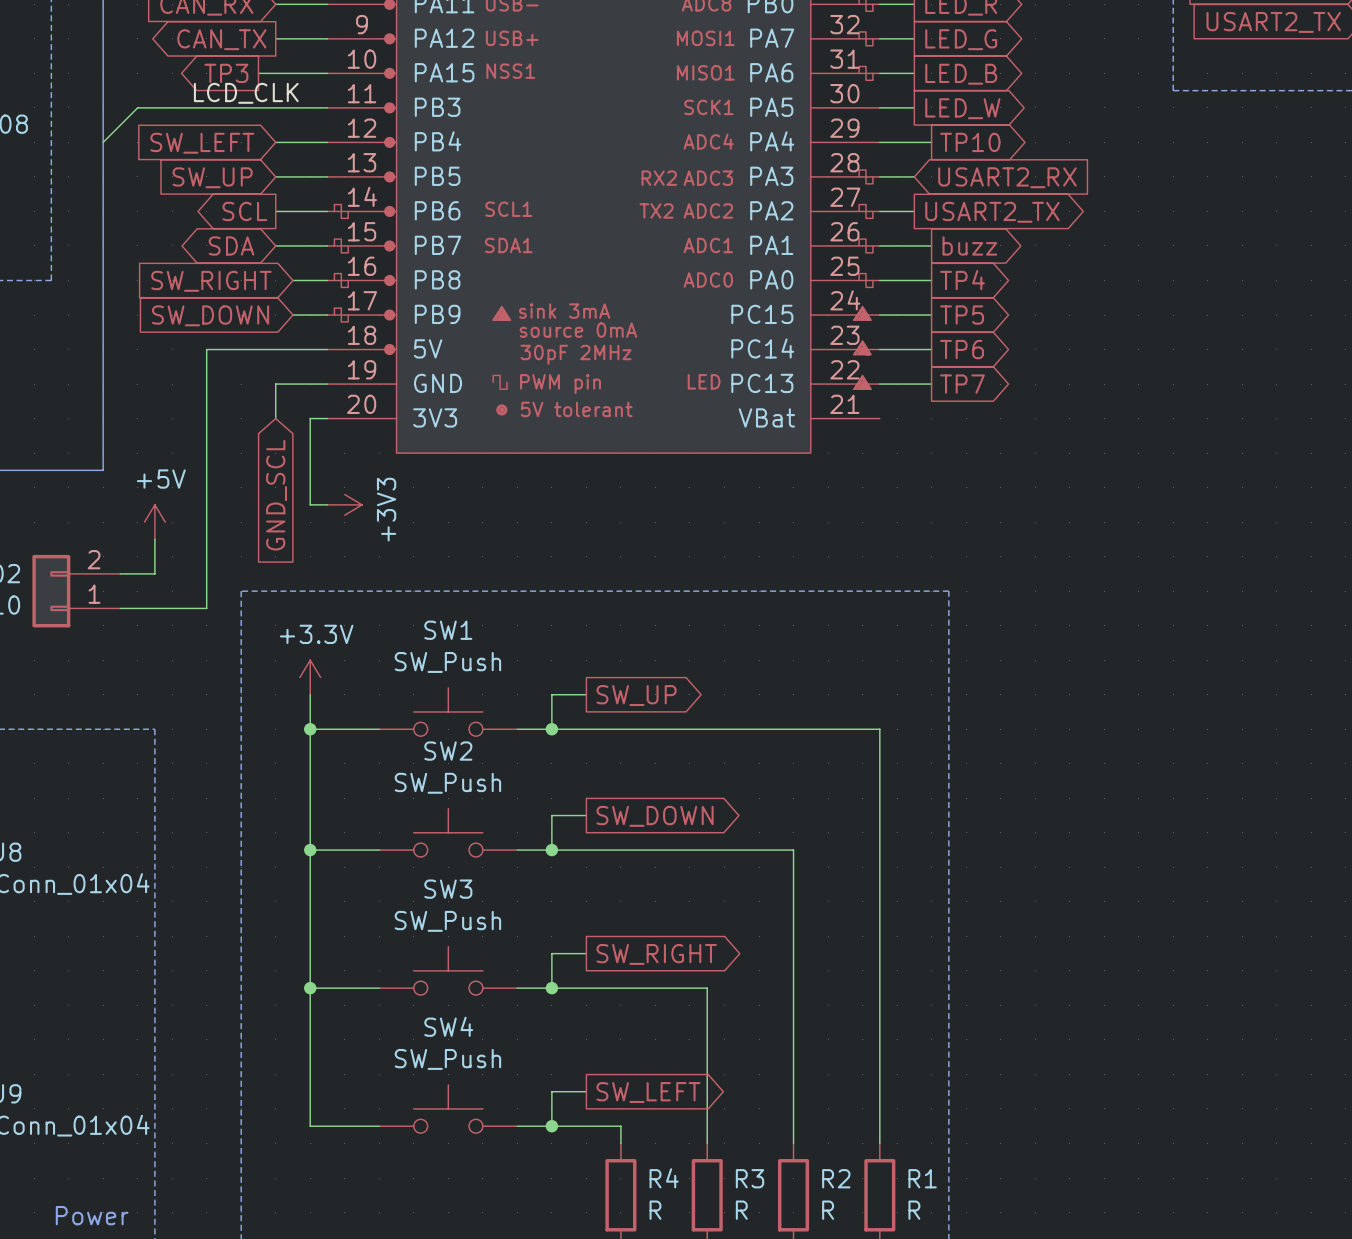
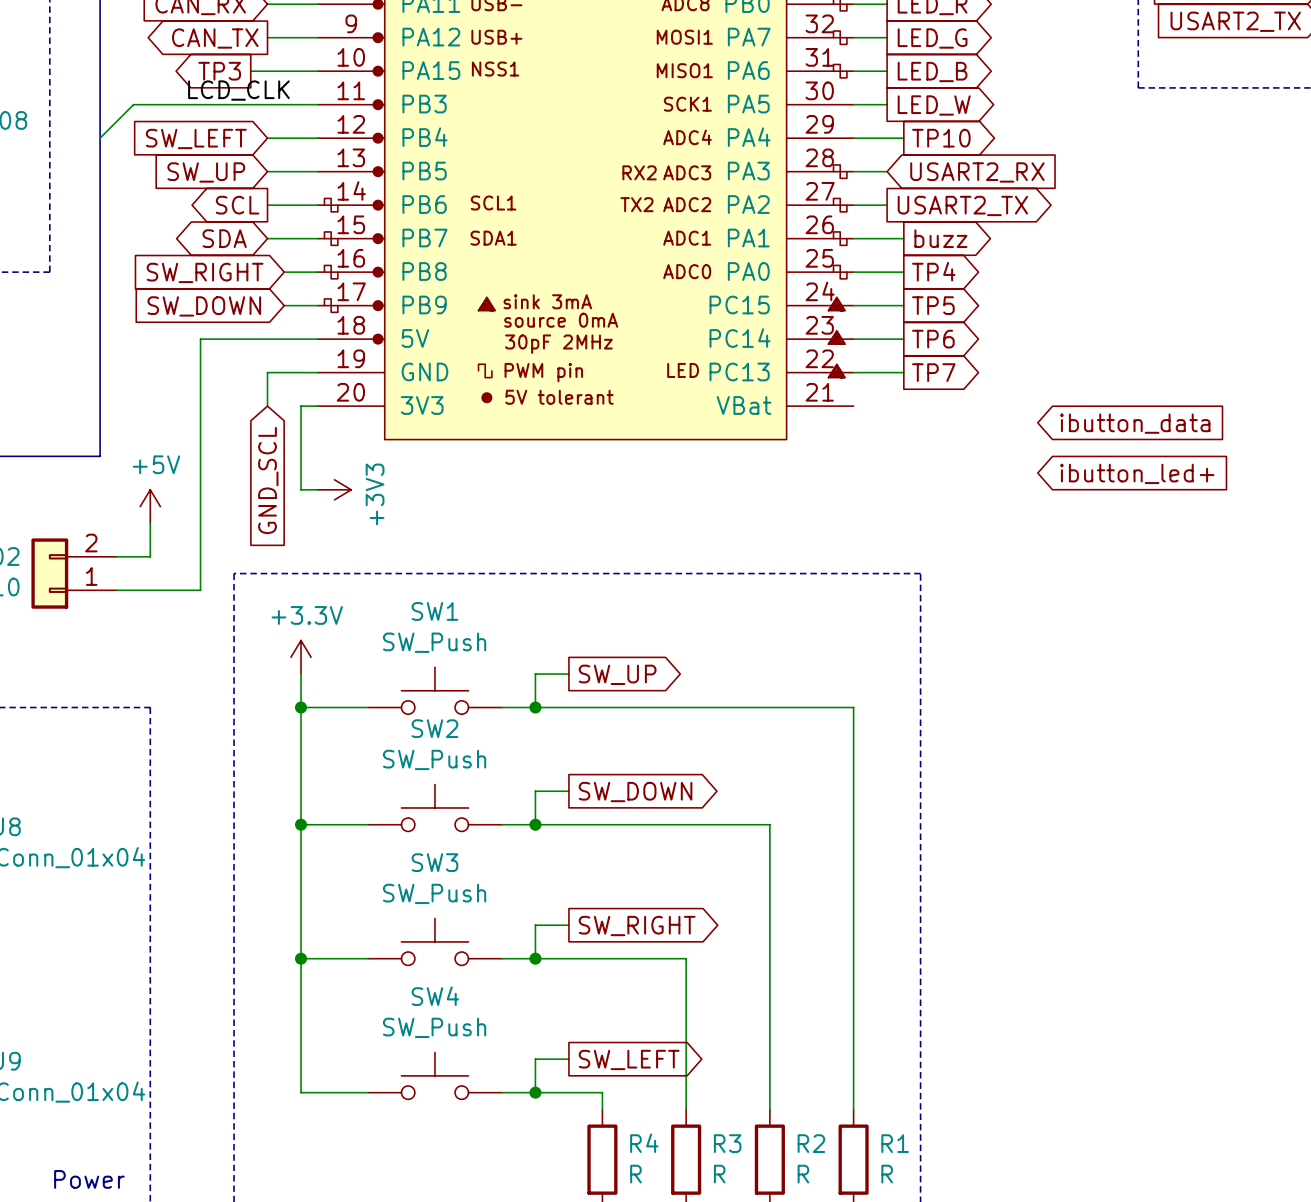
global label: none -> ibutton_data (1135, 423)
global label: none -> ibutton_led+ (1137, 473)

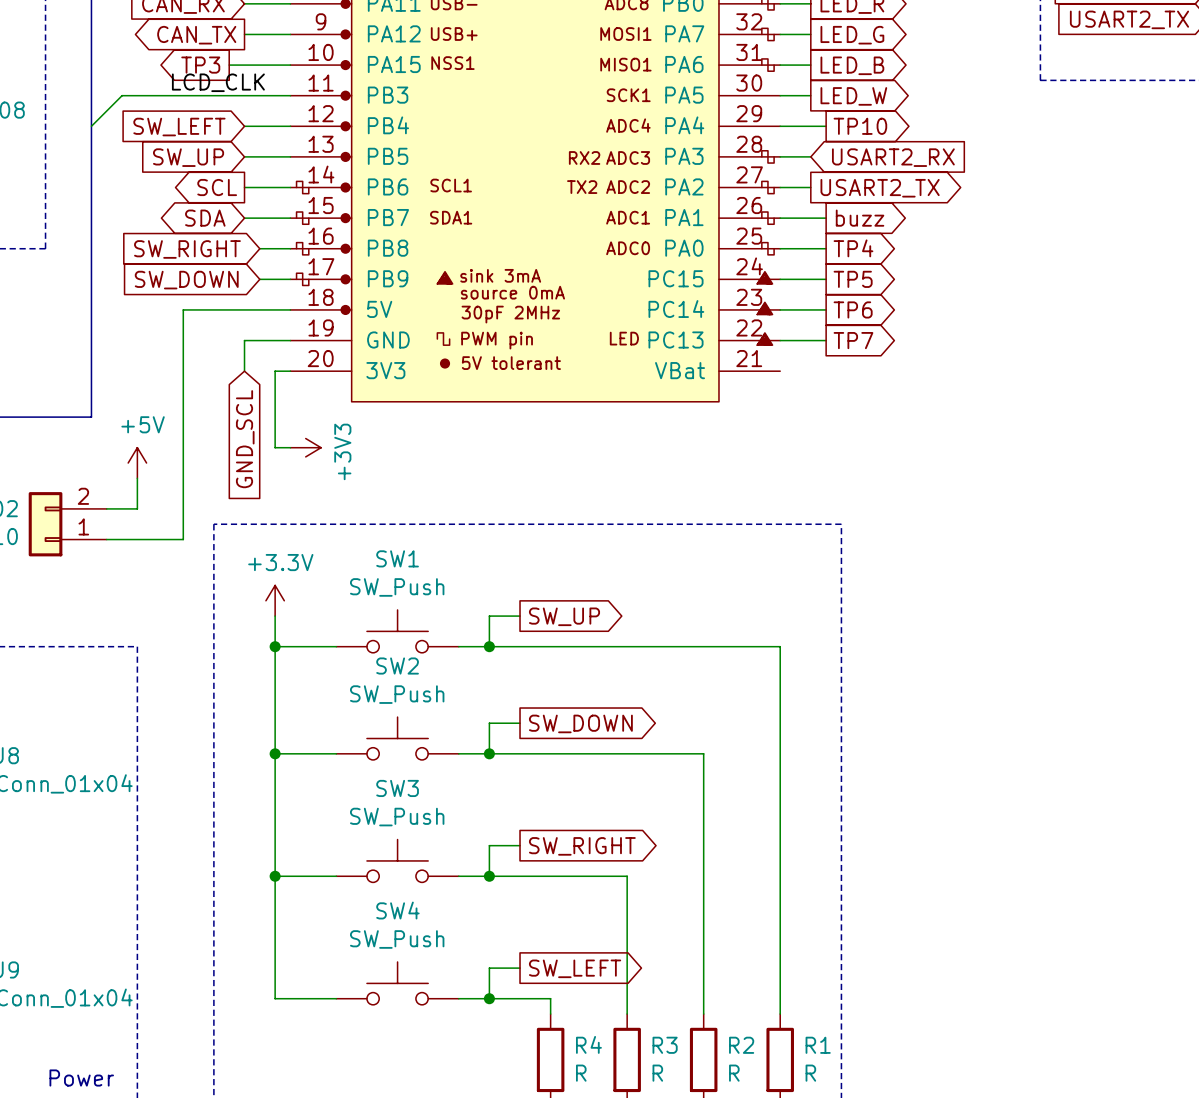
global label: ibutton_data (1135, 423) -> none
global label: ibutton_led+ (1137, 473) -> none

